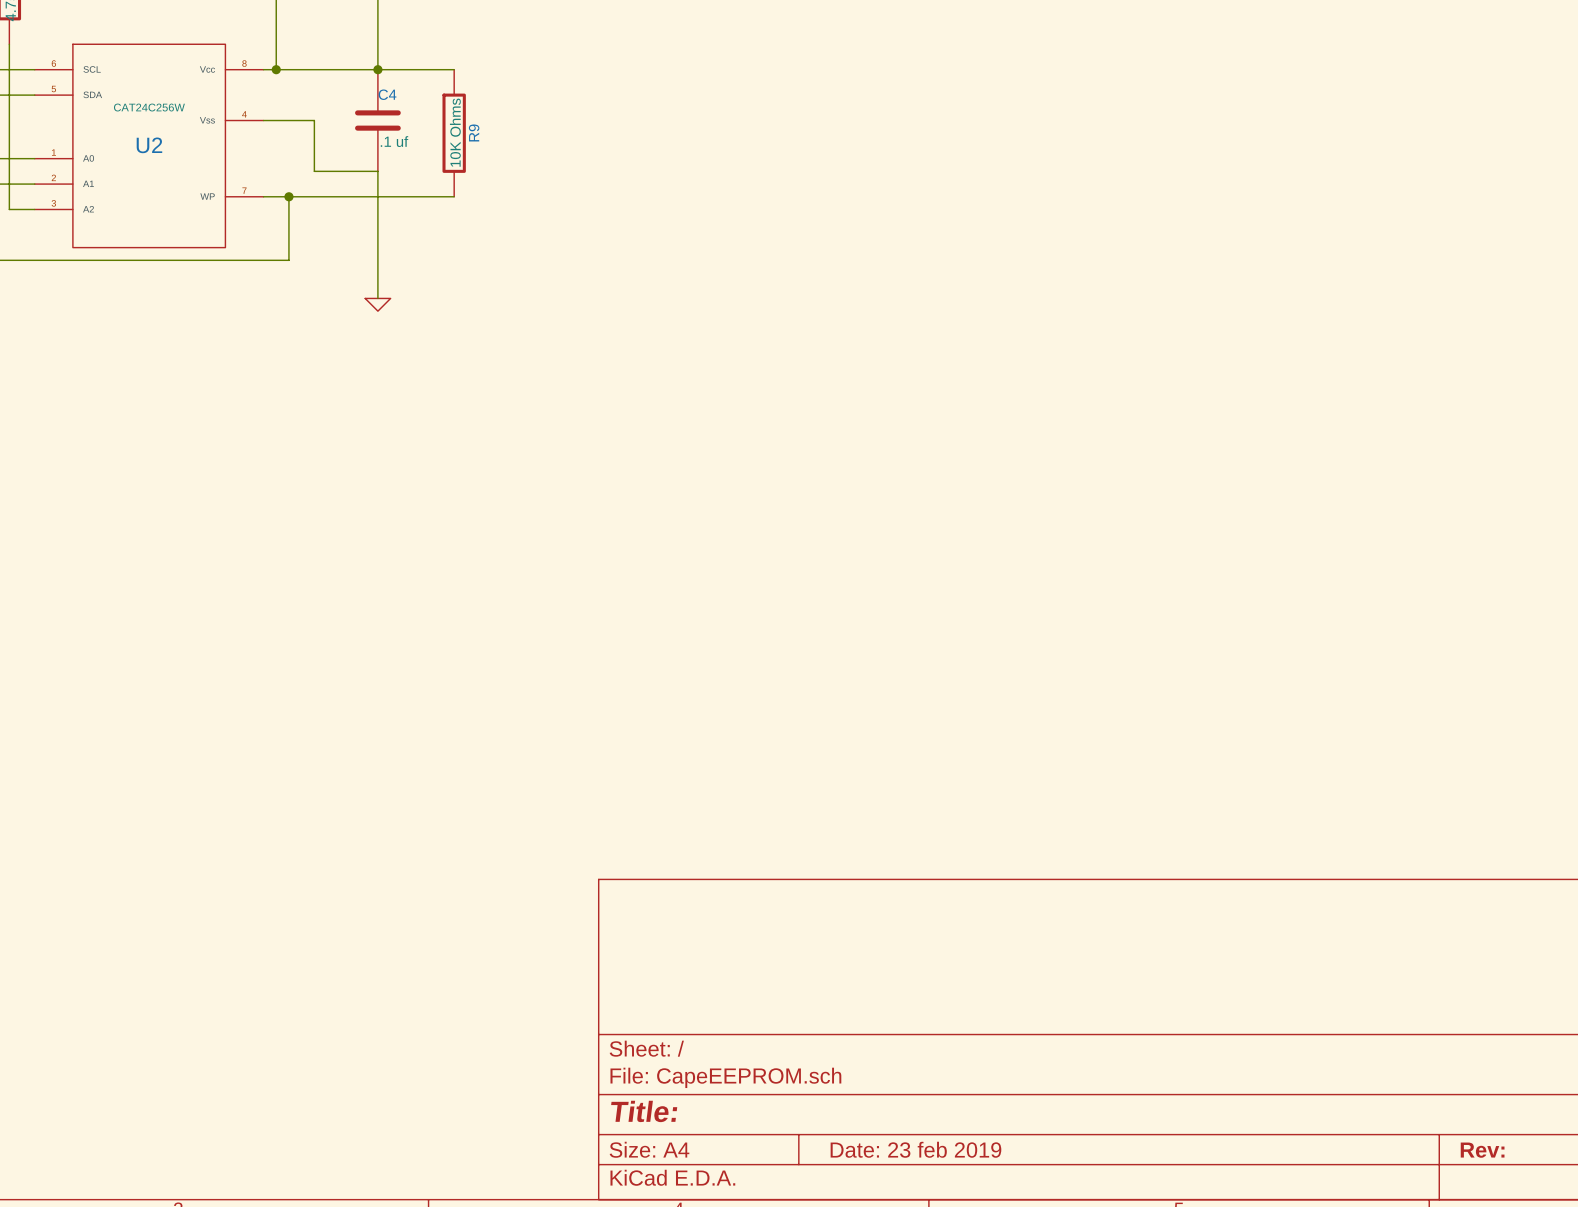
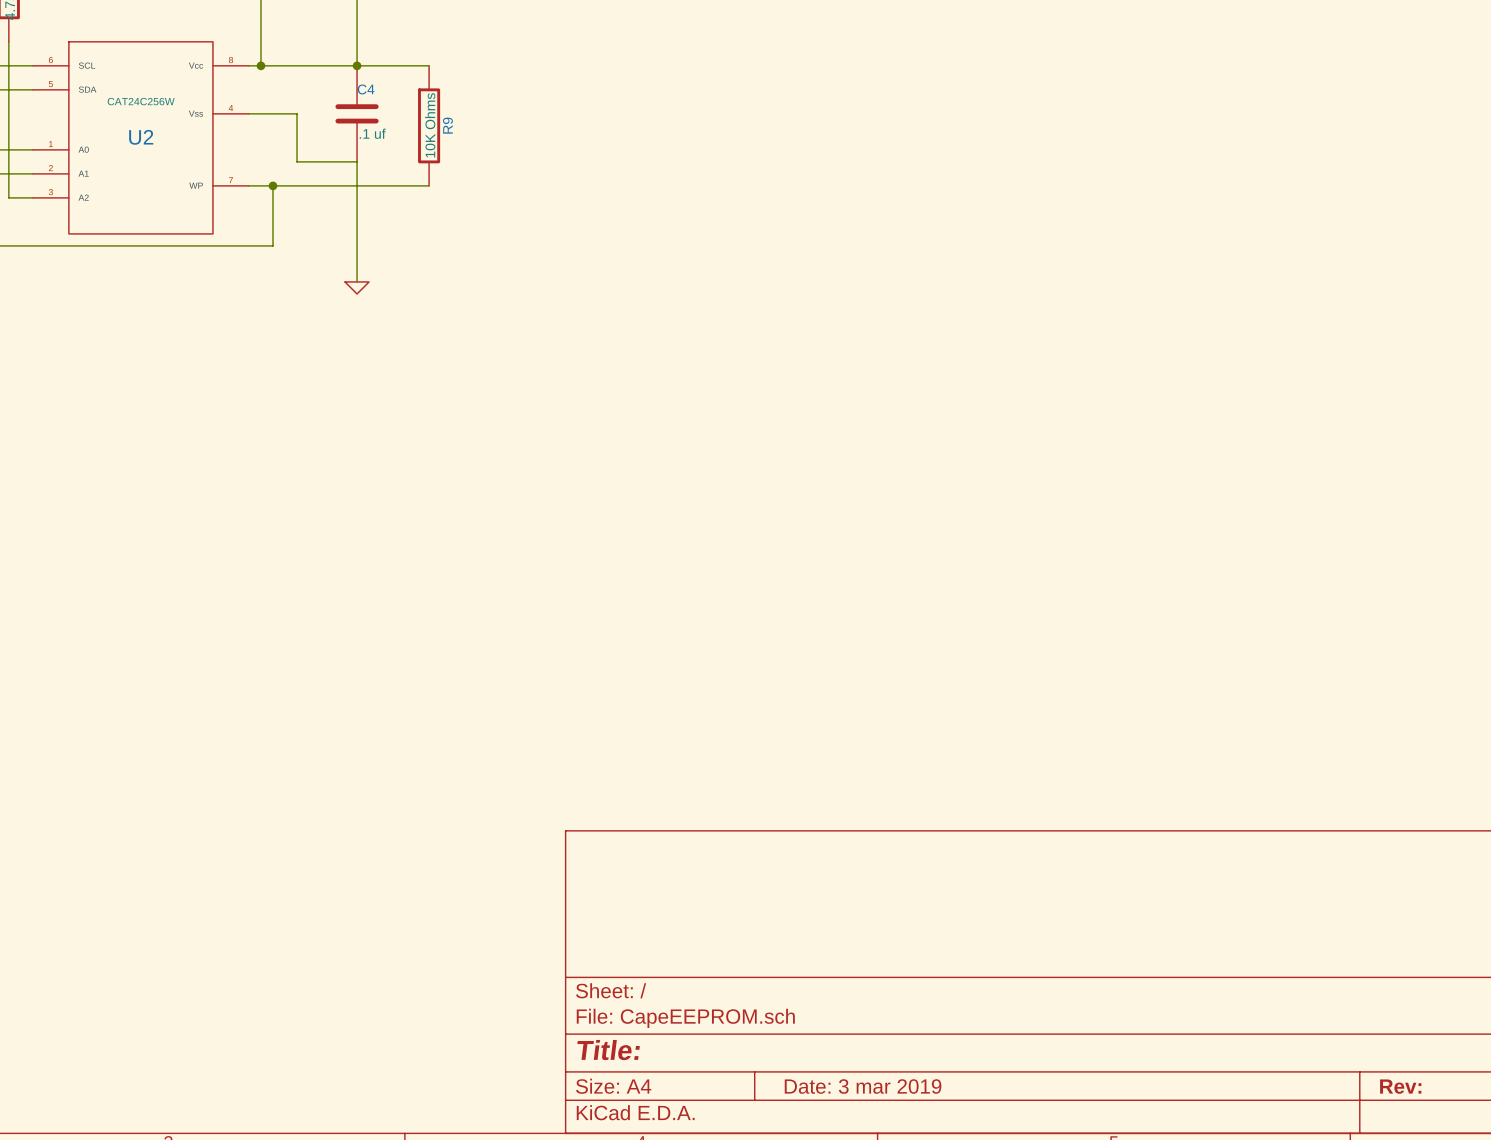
title block: Date: 23 feb 2019 (915, 1149) -> Date: 3 mar 2019 (863, 1086)

